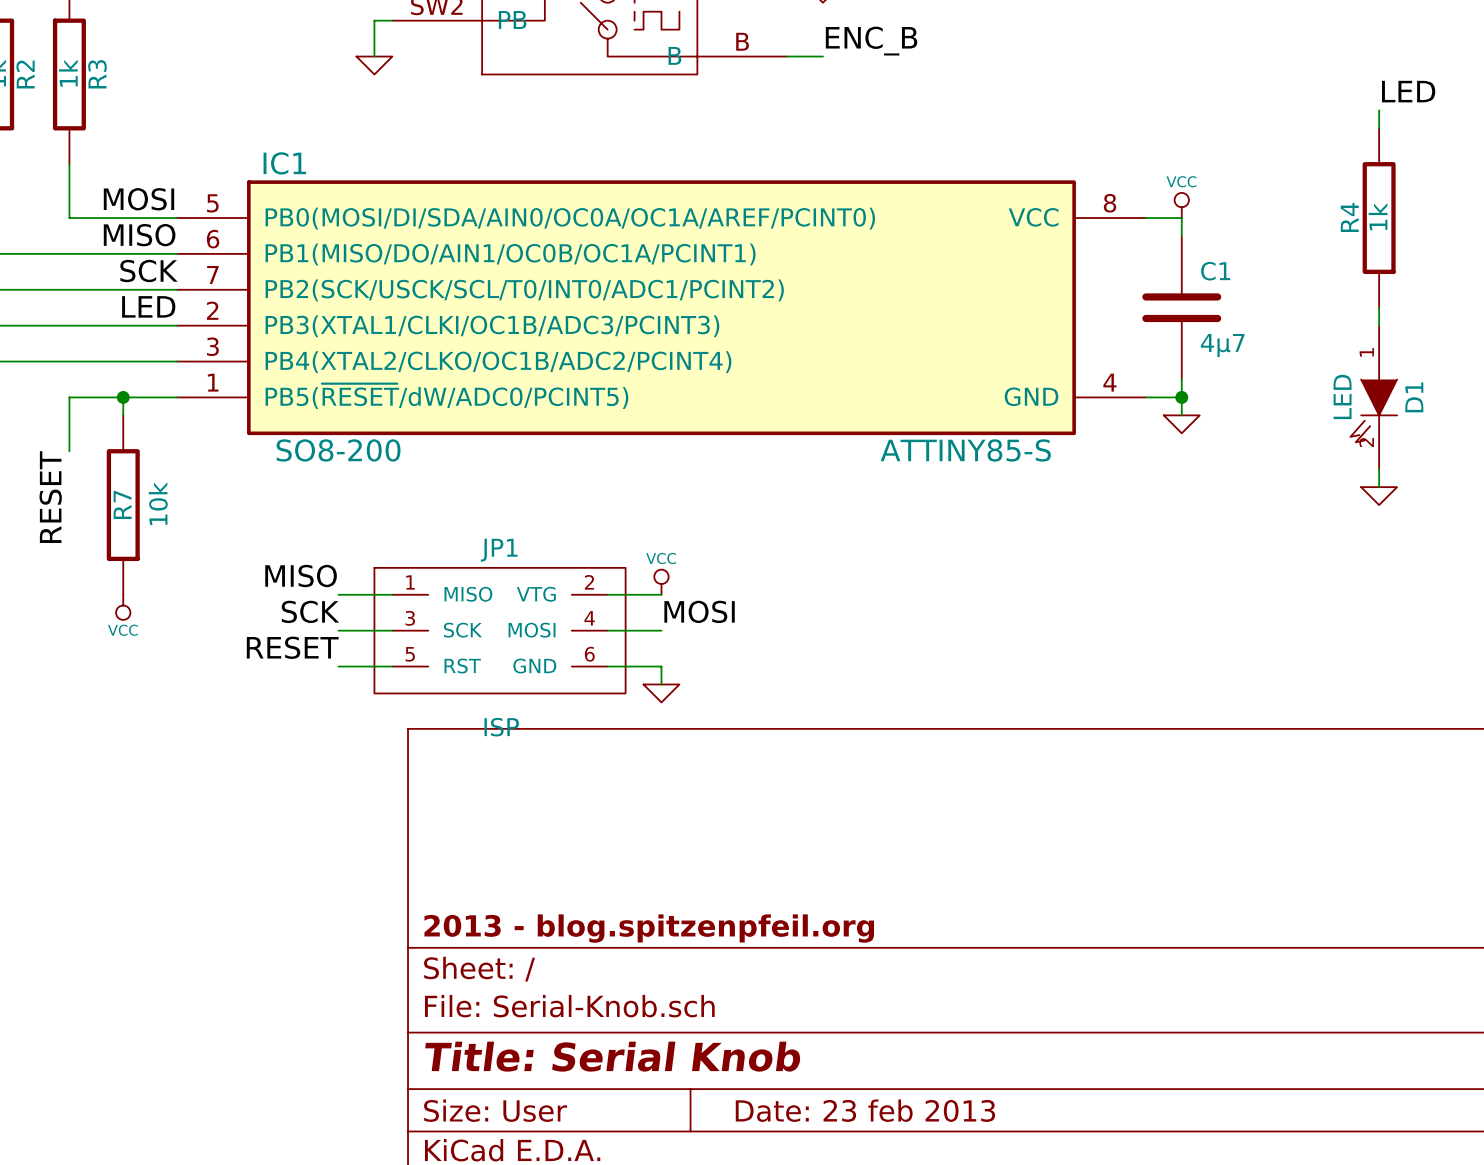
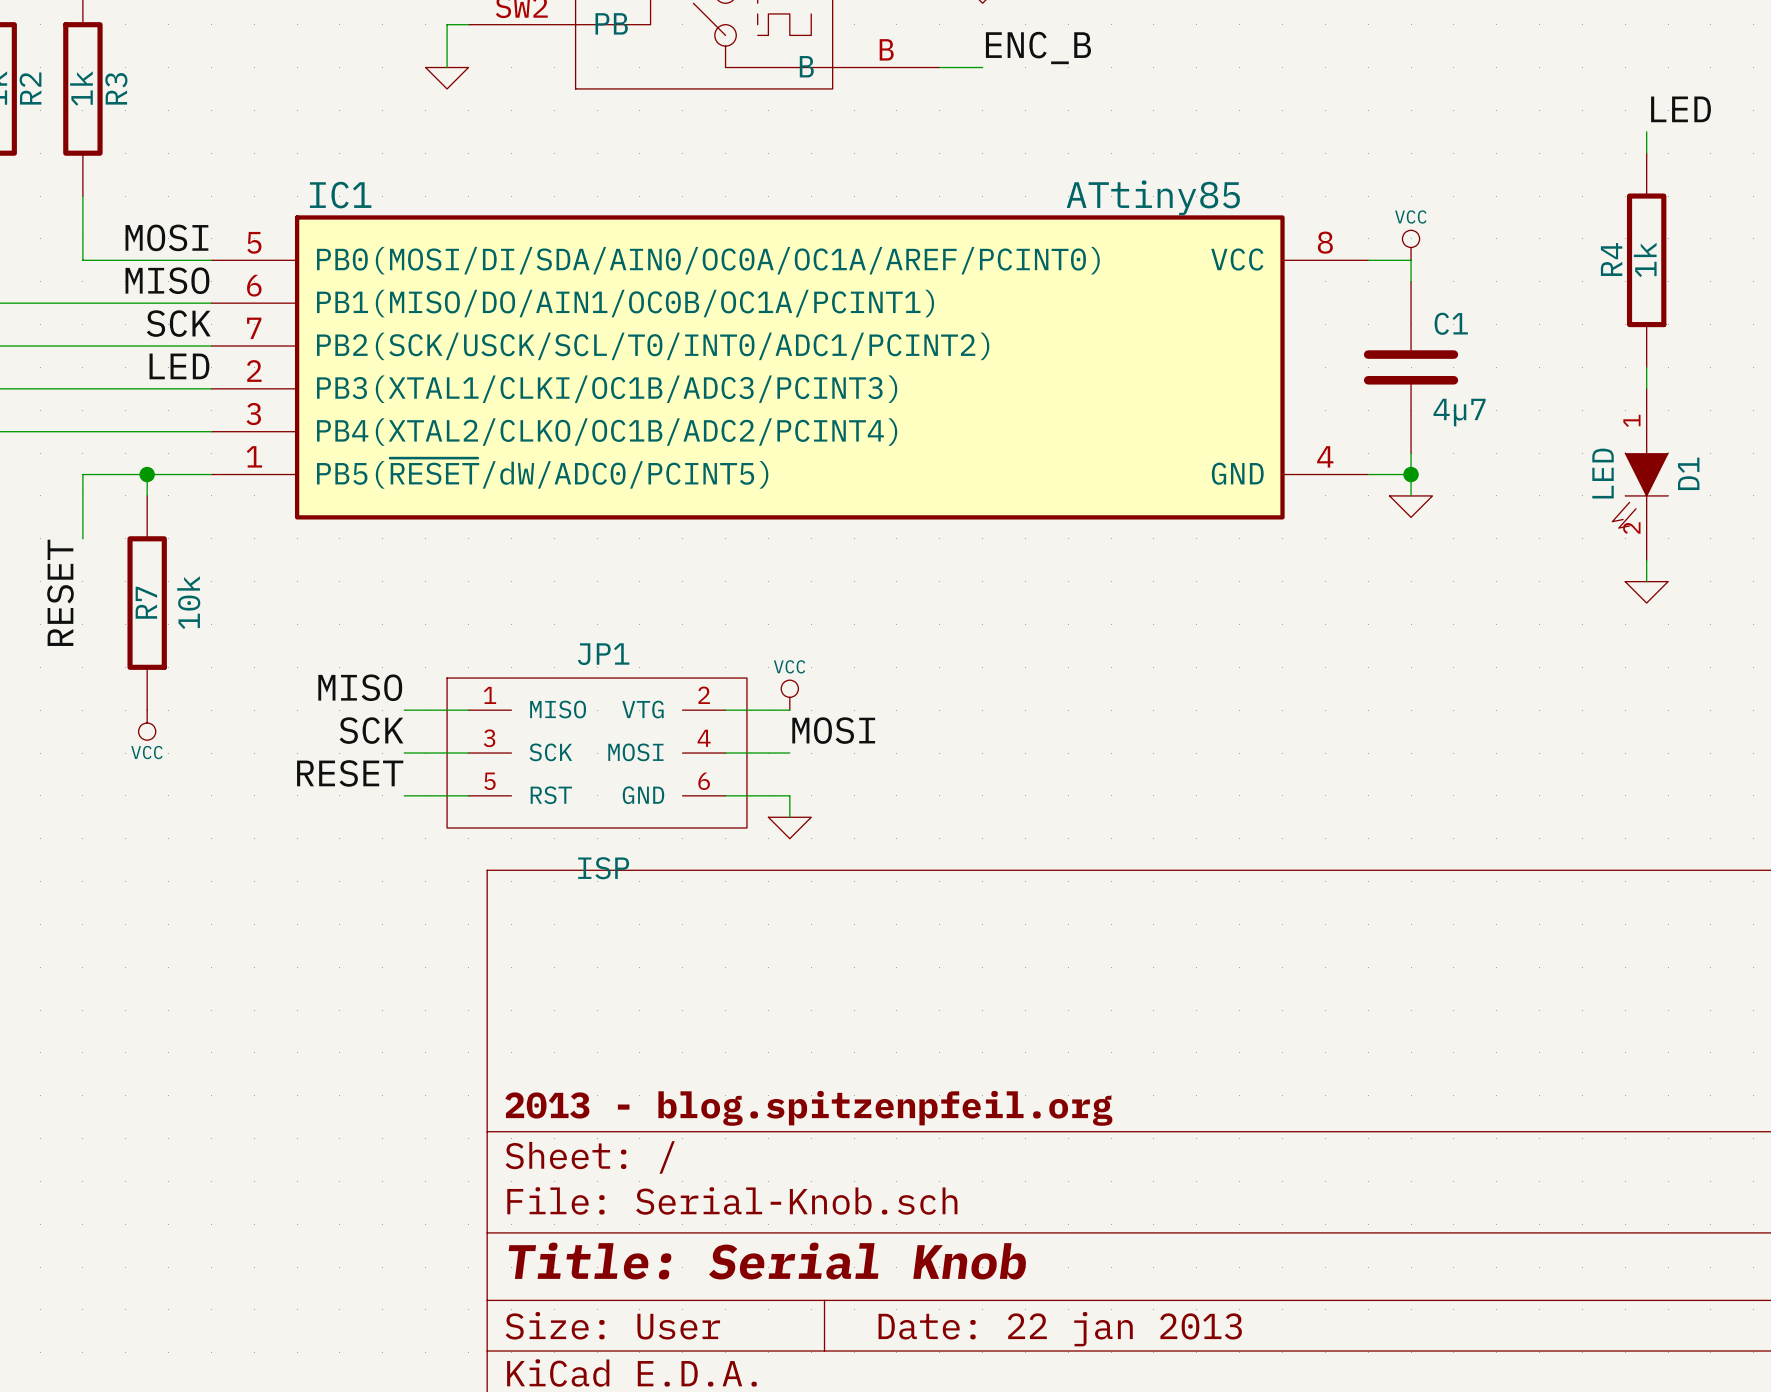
IC1 text: SO8-200 (338, 450) -> none
IC1 value: ATTINY85-S (965, 450) -> ATtiny85 (1153, 197)
title block: Date: 23 feb 2013 (865, 1110) -> Date: 22 jan 2013 (1060, 1329)

